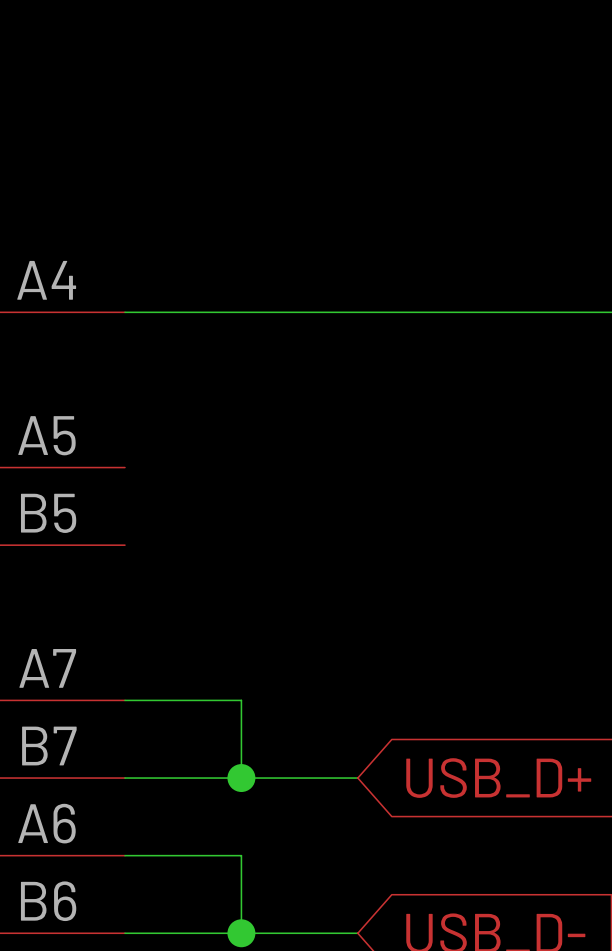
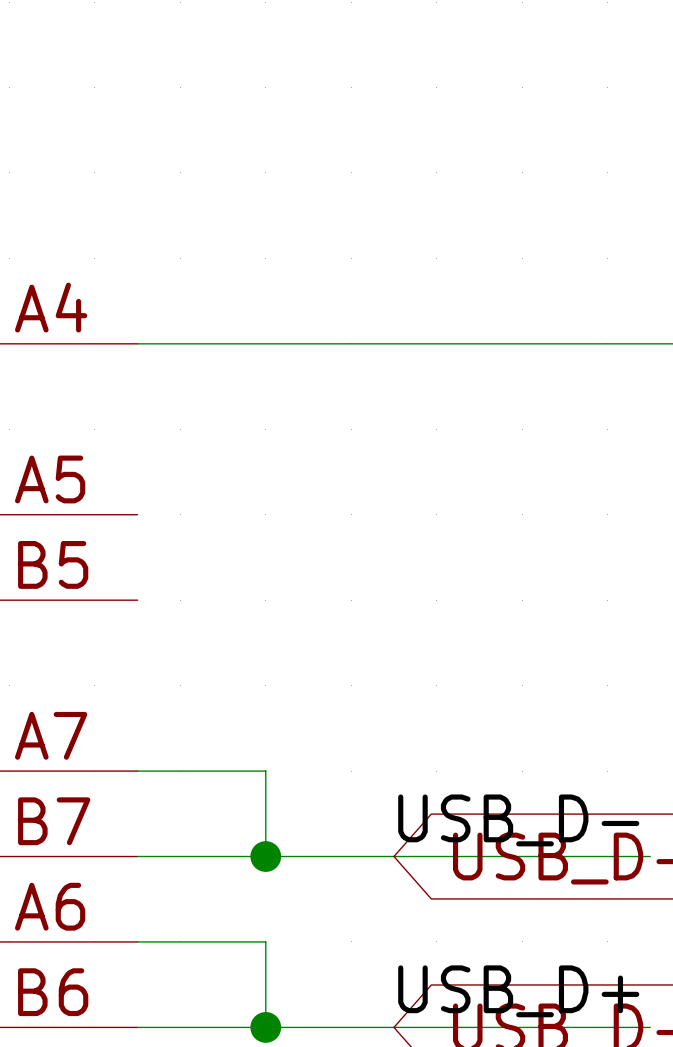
label: none -> USB_D- (518, 820)
wire: none -> (393, 856) (650, 856)
label: none -> USB_D+ (518, 991)
wire: none -> (393, 1027) (650, 1027)

